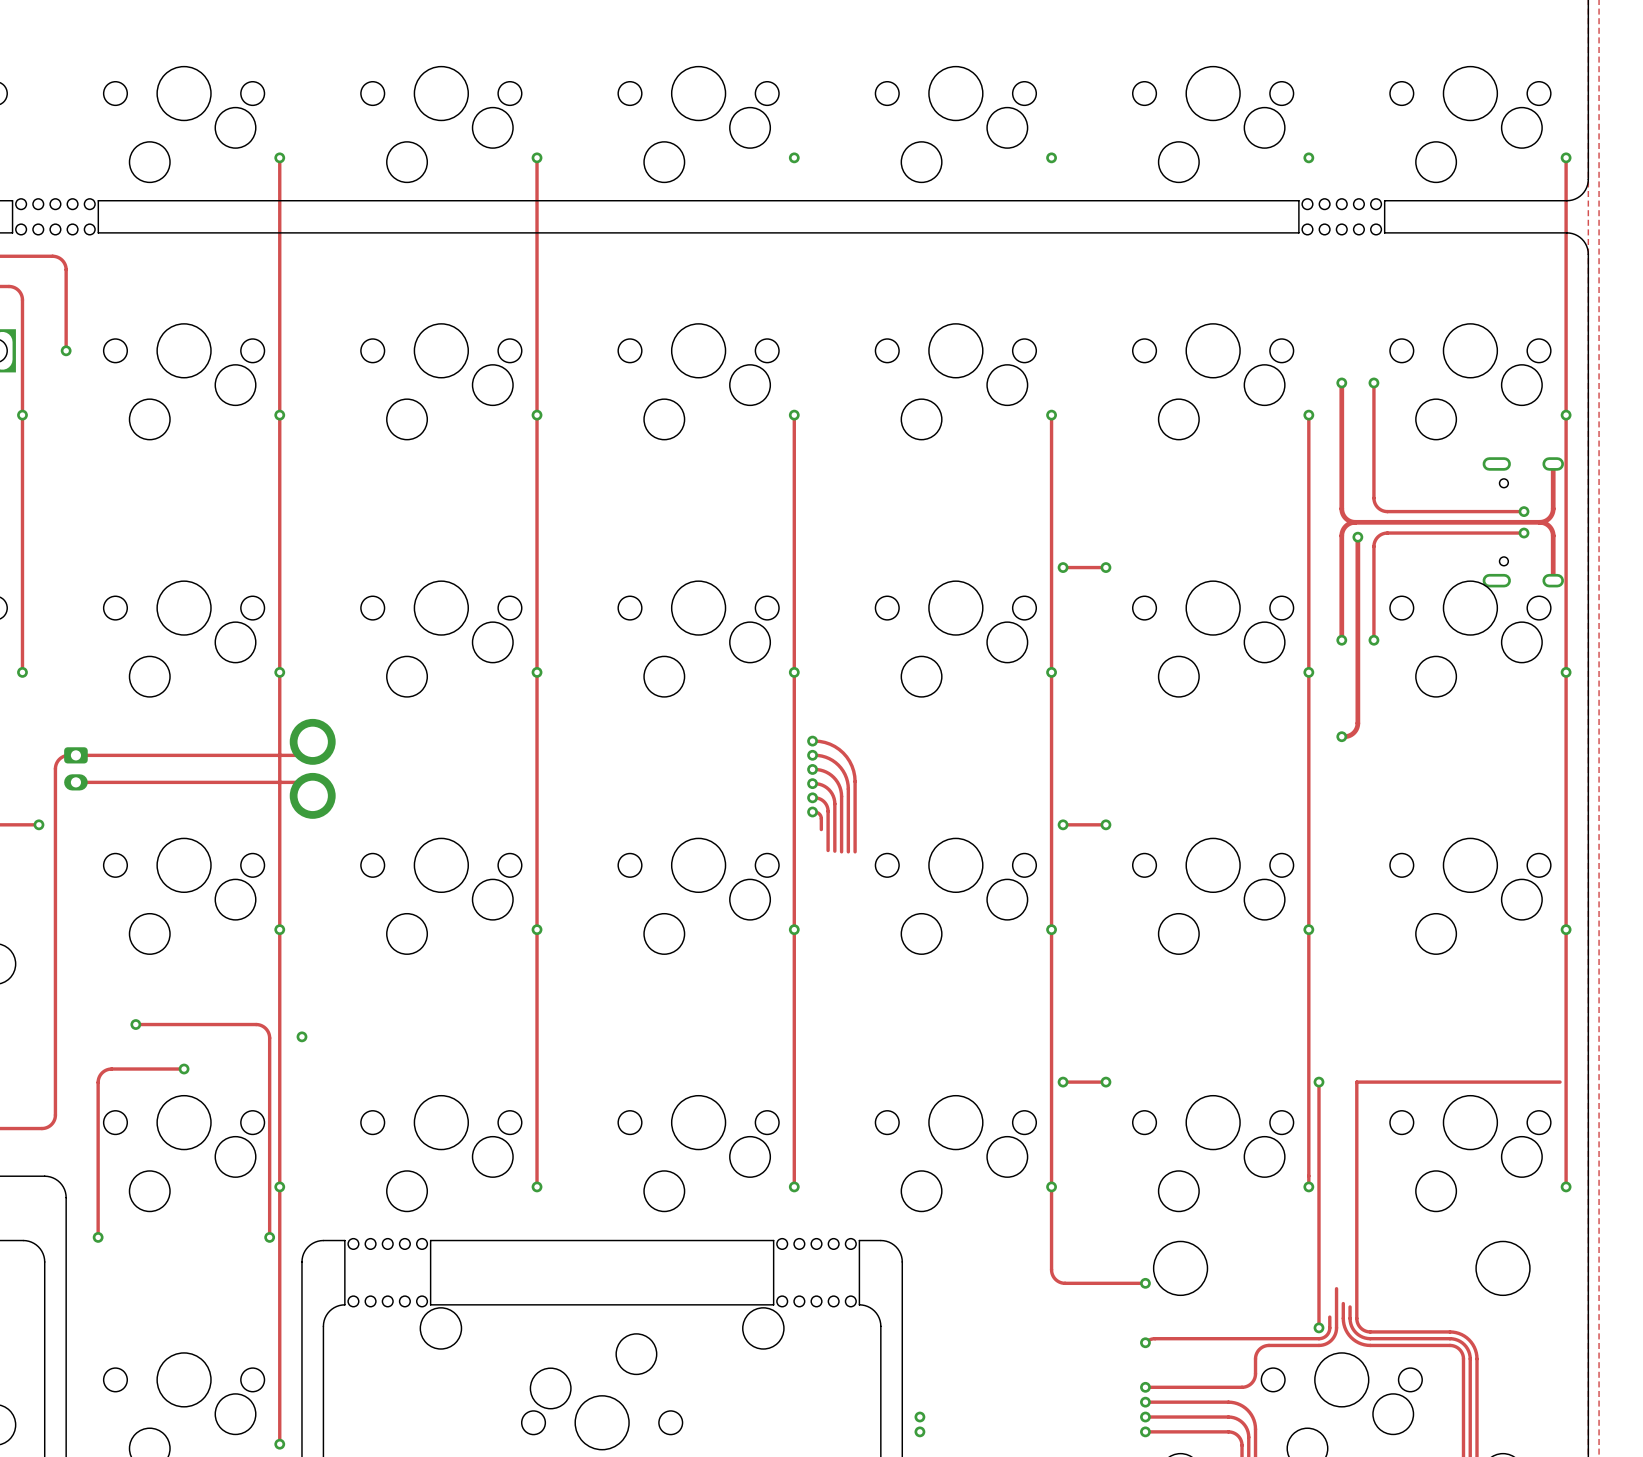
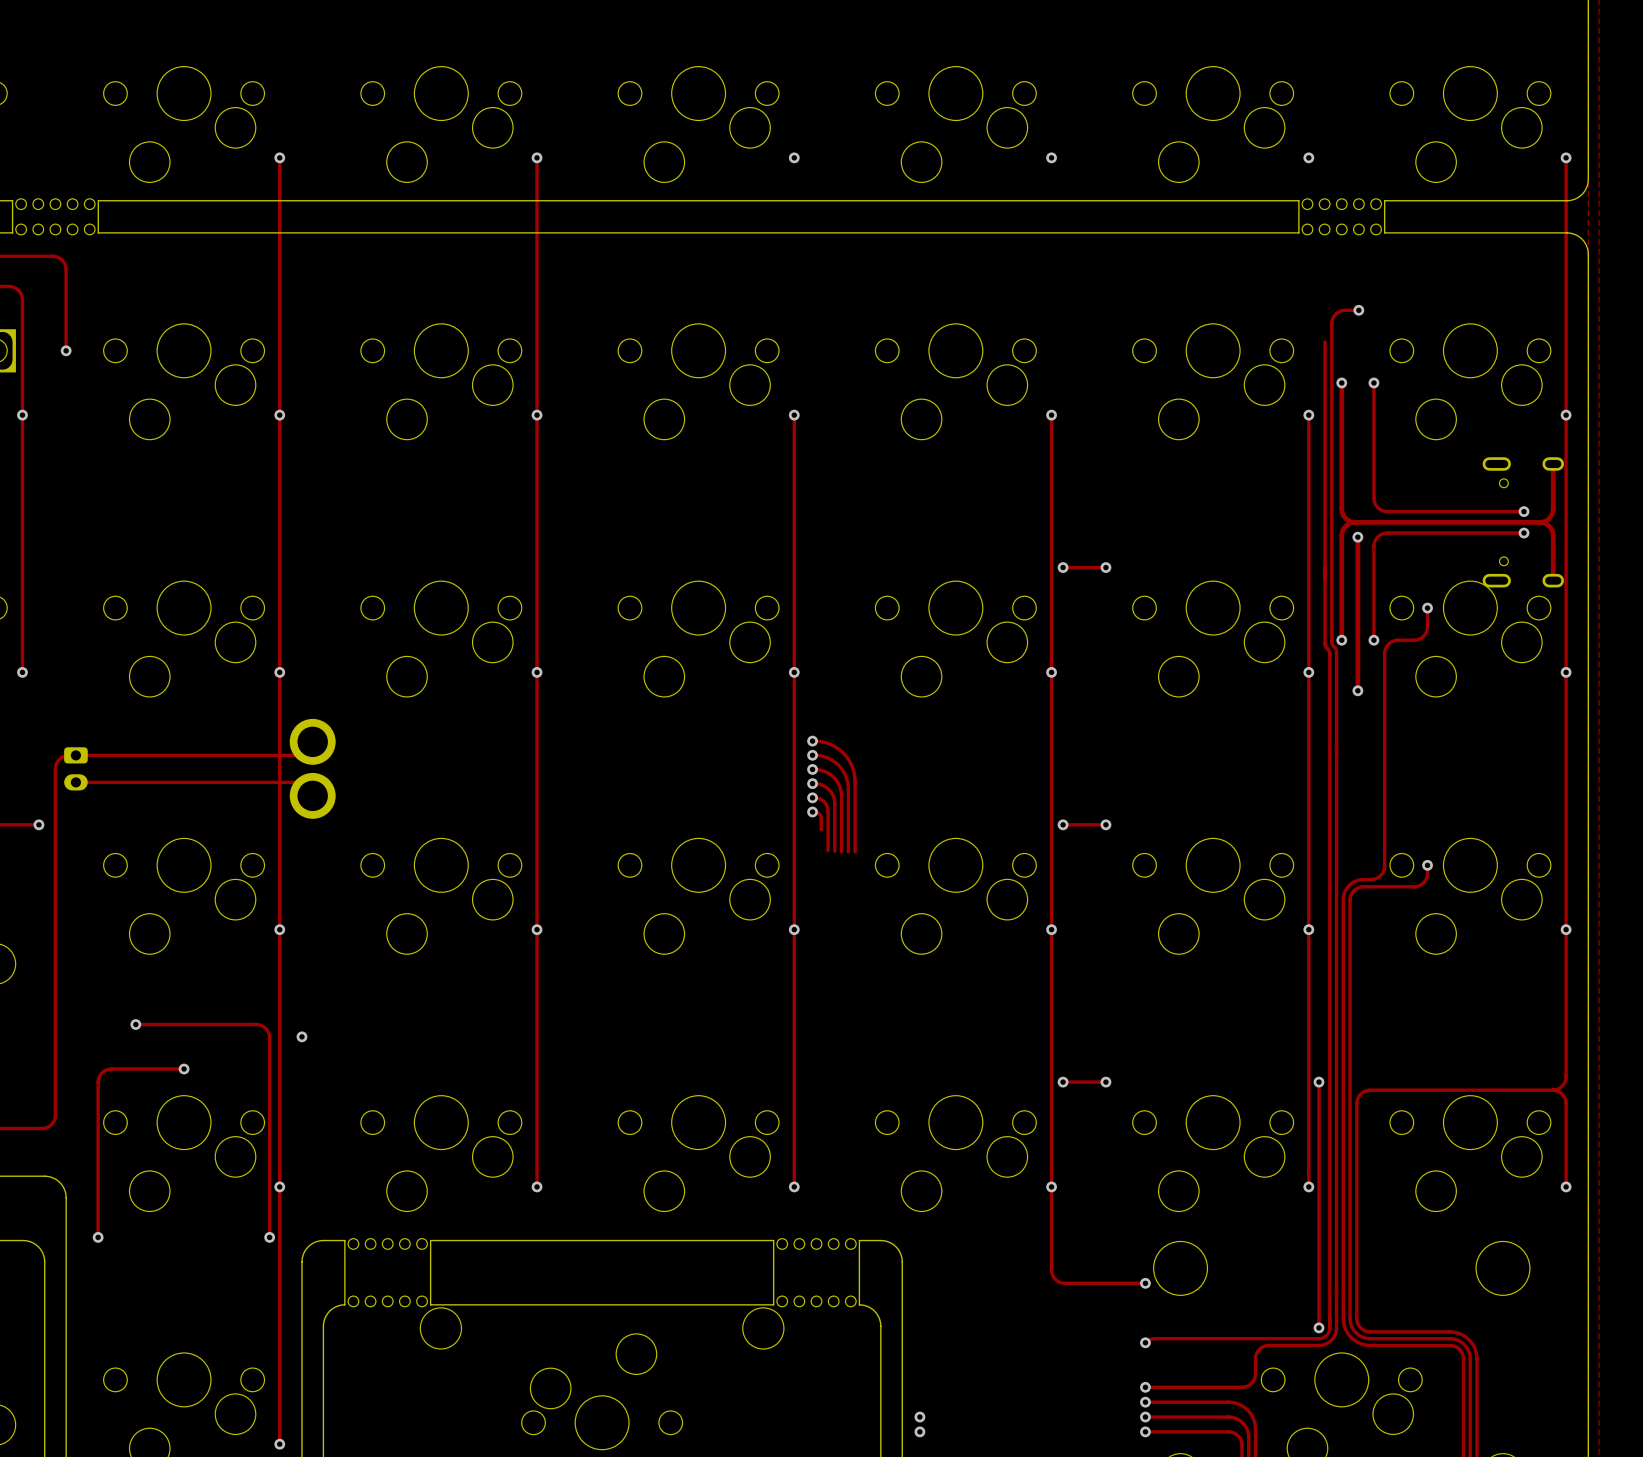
track: none -> (1358, 310) (1339, 311) (1333, 316) (1331, 323) (1331, 641) (1336, 652) (1336, 1288)
via: none -> (1358, 310)
track: none -> (1325, 342) (1325, 643) (1329, 653) (1329, 1317)
track: none -> (1427, 608) (1427, 628) (1423, 636) (1415, 640) (1393, 640) (1387, 645) (1384, 652) (1383, 870) (1375, 878) (1353, 882) (1346, 889) (1343, 897) (1343, 1303)
via: none -> (1427, 608)
track: (1357, 690) (1357, 727) (1351, 734) (1341, 736) -> none
via position: (1341, 736) -> (1357, 690)
track: none -> (1427, 865) (1426, 879) (1418, 886) (1362, 886) (1354, 890) (1350, 897) (1350, 1306)
via: none -> (1427, 865)
track: (1566, 1076) (1566, 1103) -> (1566, 1076) (1562, 1086) (1552, 1090)
track: (1560, 1082) (1356, 1082) (1356, 1103) -> (1552, 1090) (1368, 1090) (1360, 1094) (1356, 1103)
track: none -> (1552, 1090) (1562, 1094) (1566, 1103)

